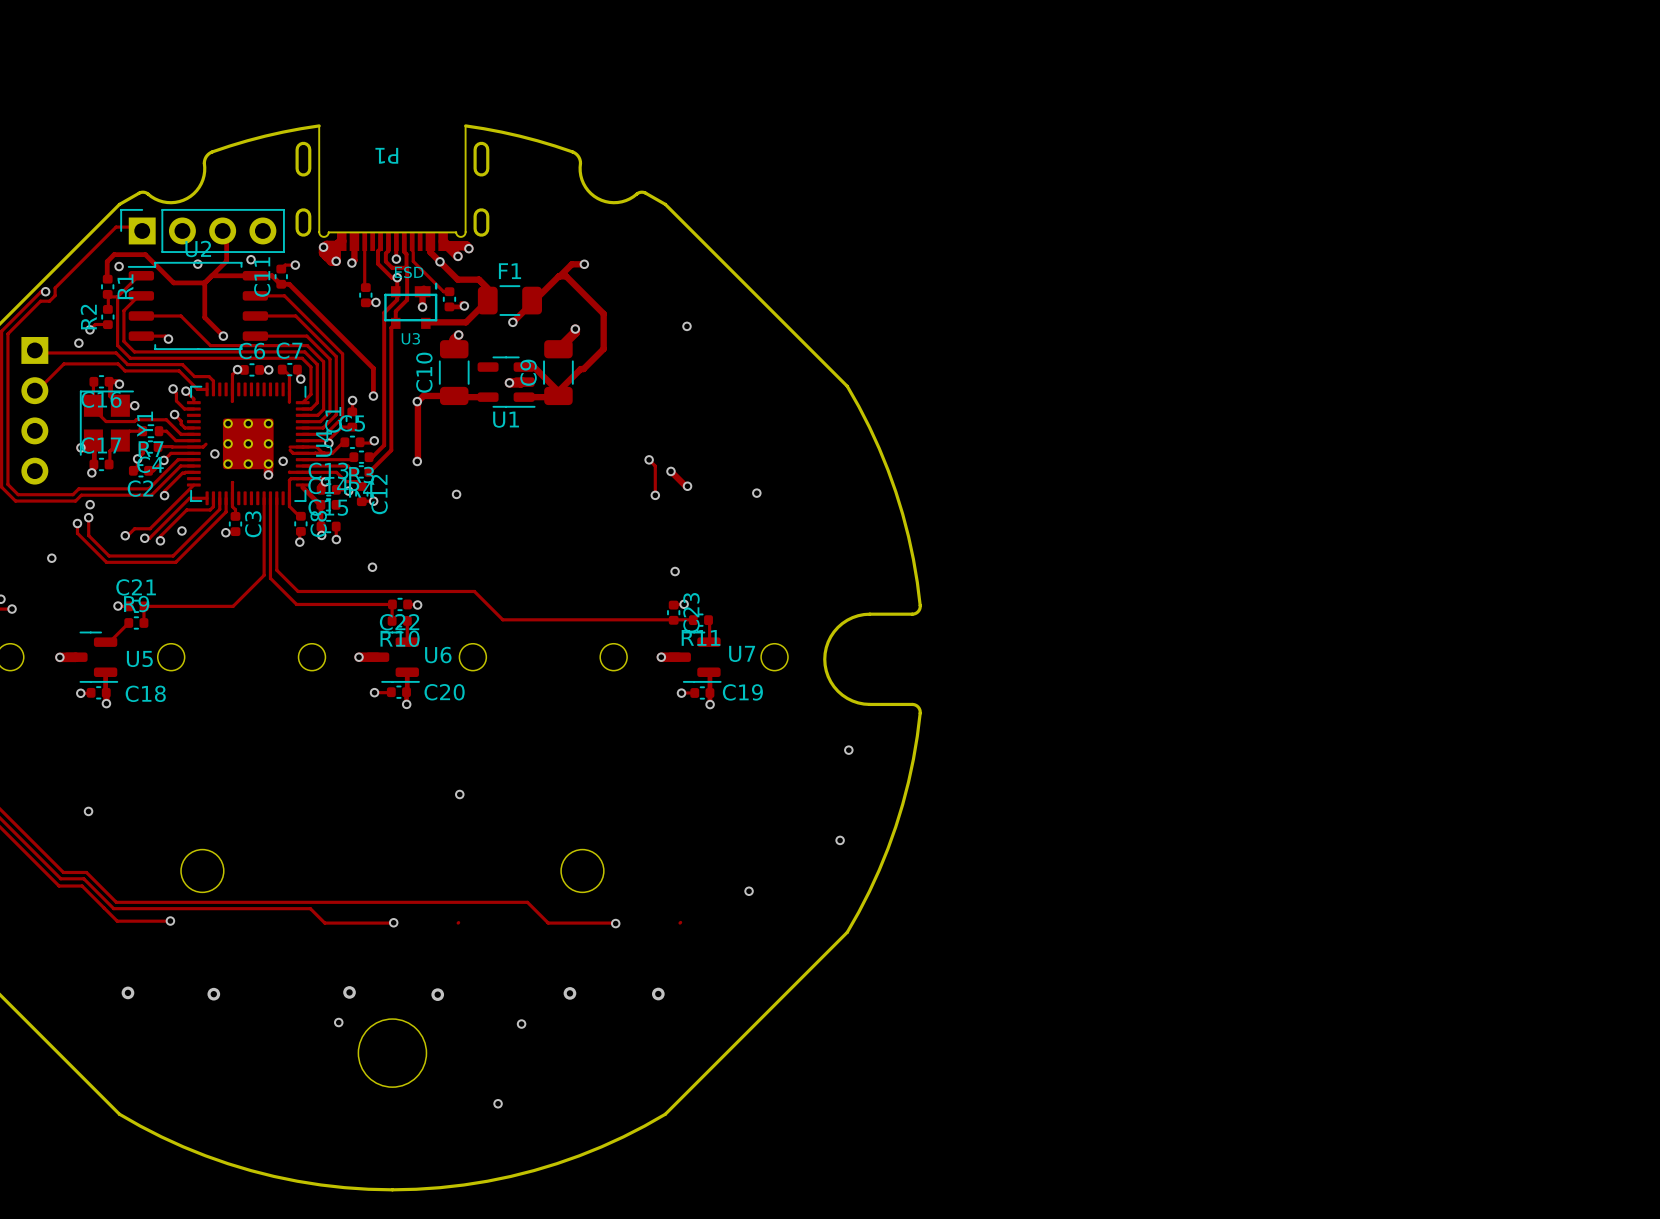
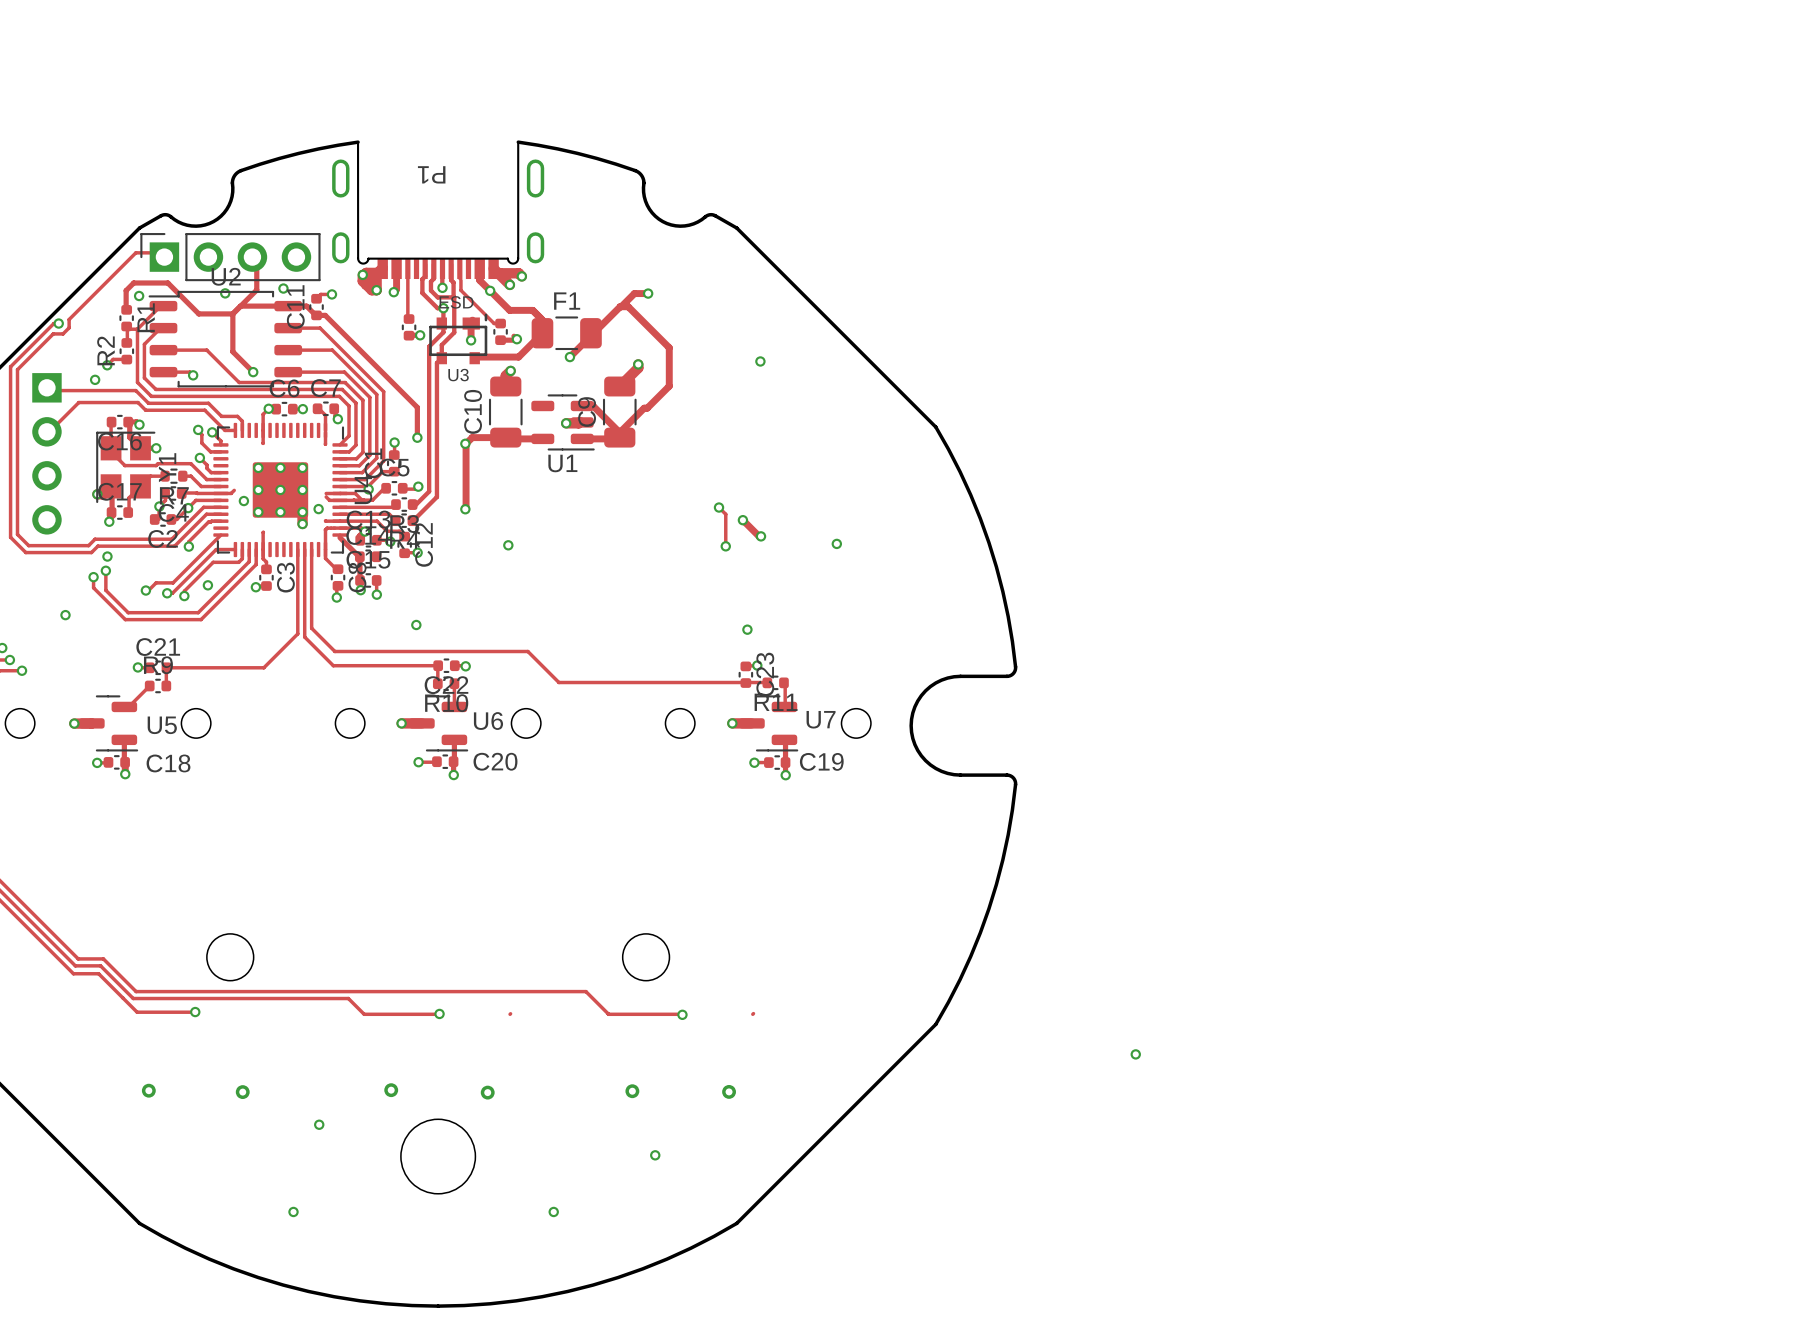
via: (848, 750) -> none
via: (459, 794) -> none
via: (88, 811) -> none
via: (840, 840) -> none
via: (749, 891) -> none
via: none -> (1135, 1054)
via position: (338, 1022) -> (319, 1124)
via position: (521, 1024) -> (655, 1155)
via: none -> (293, 1211)

